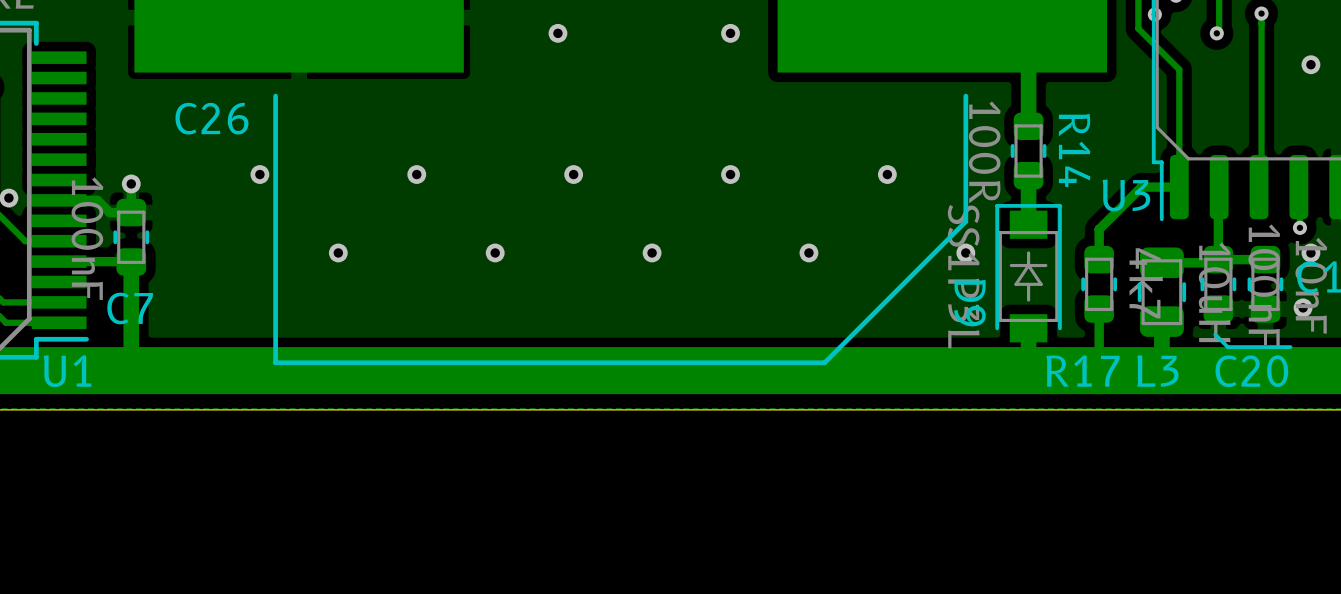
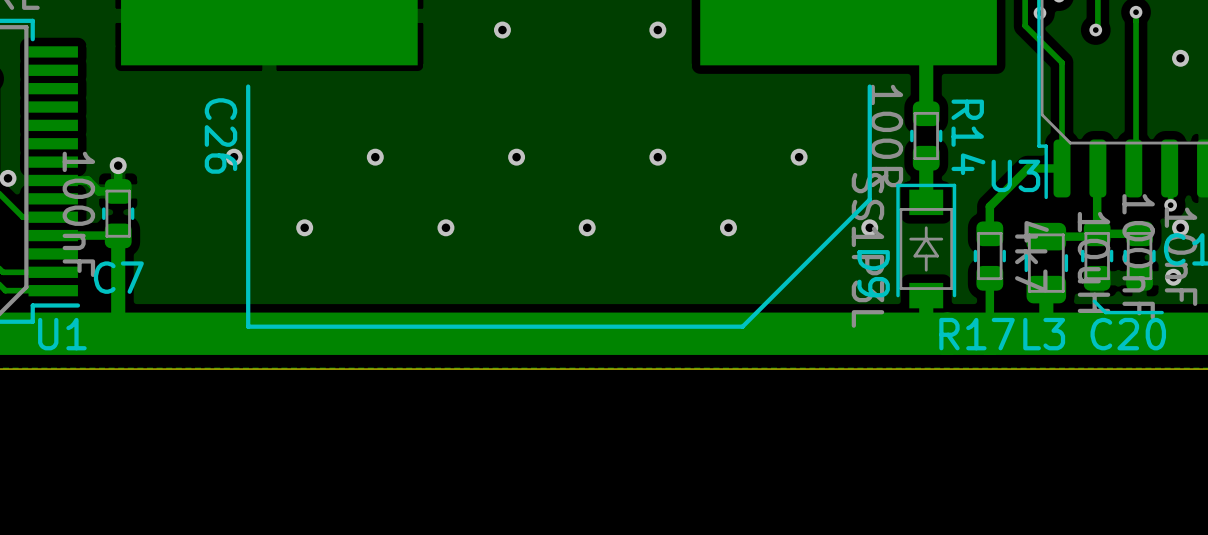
C26 name rotation: 0° (211, 118) -> 90° clockwise (220, 135)

